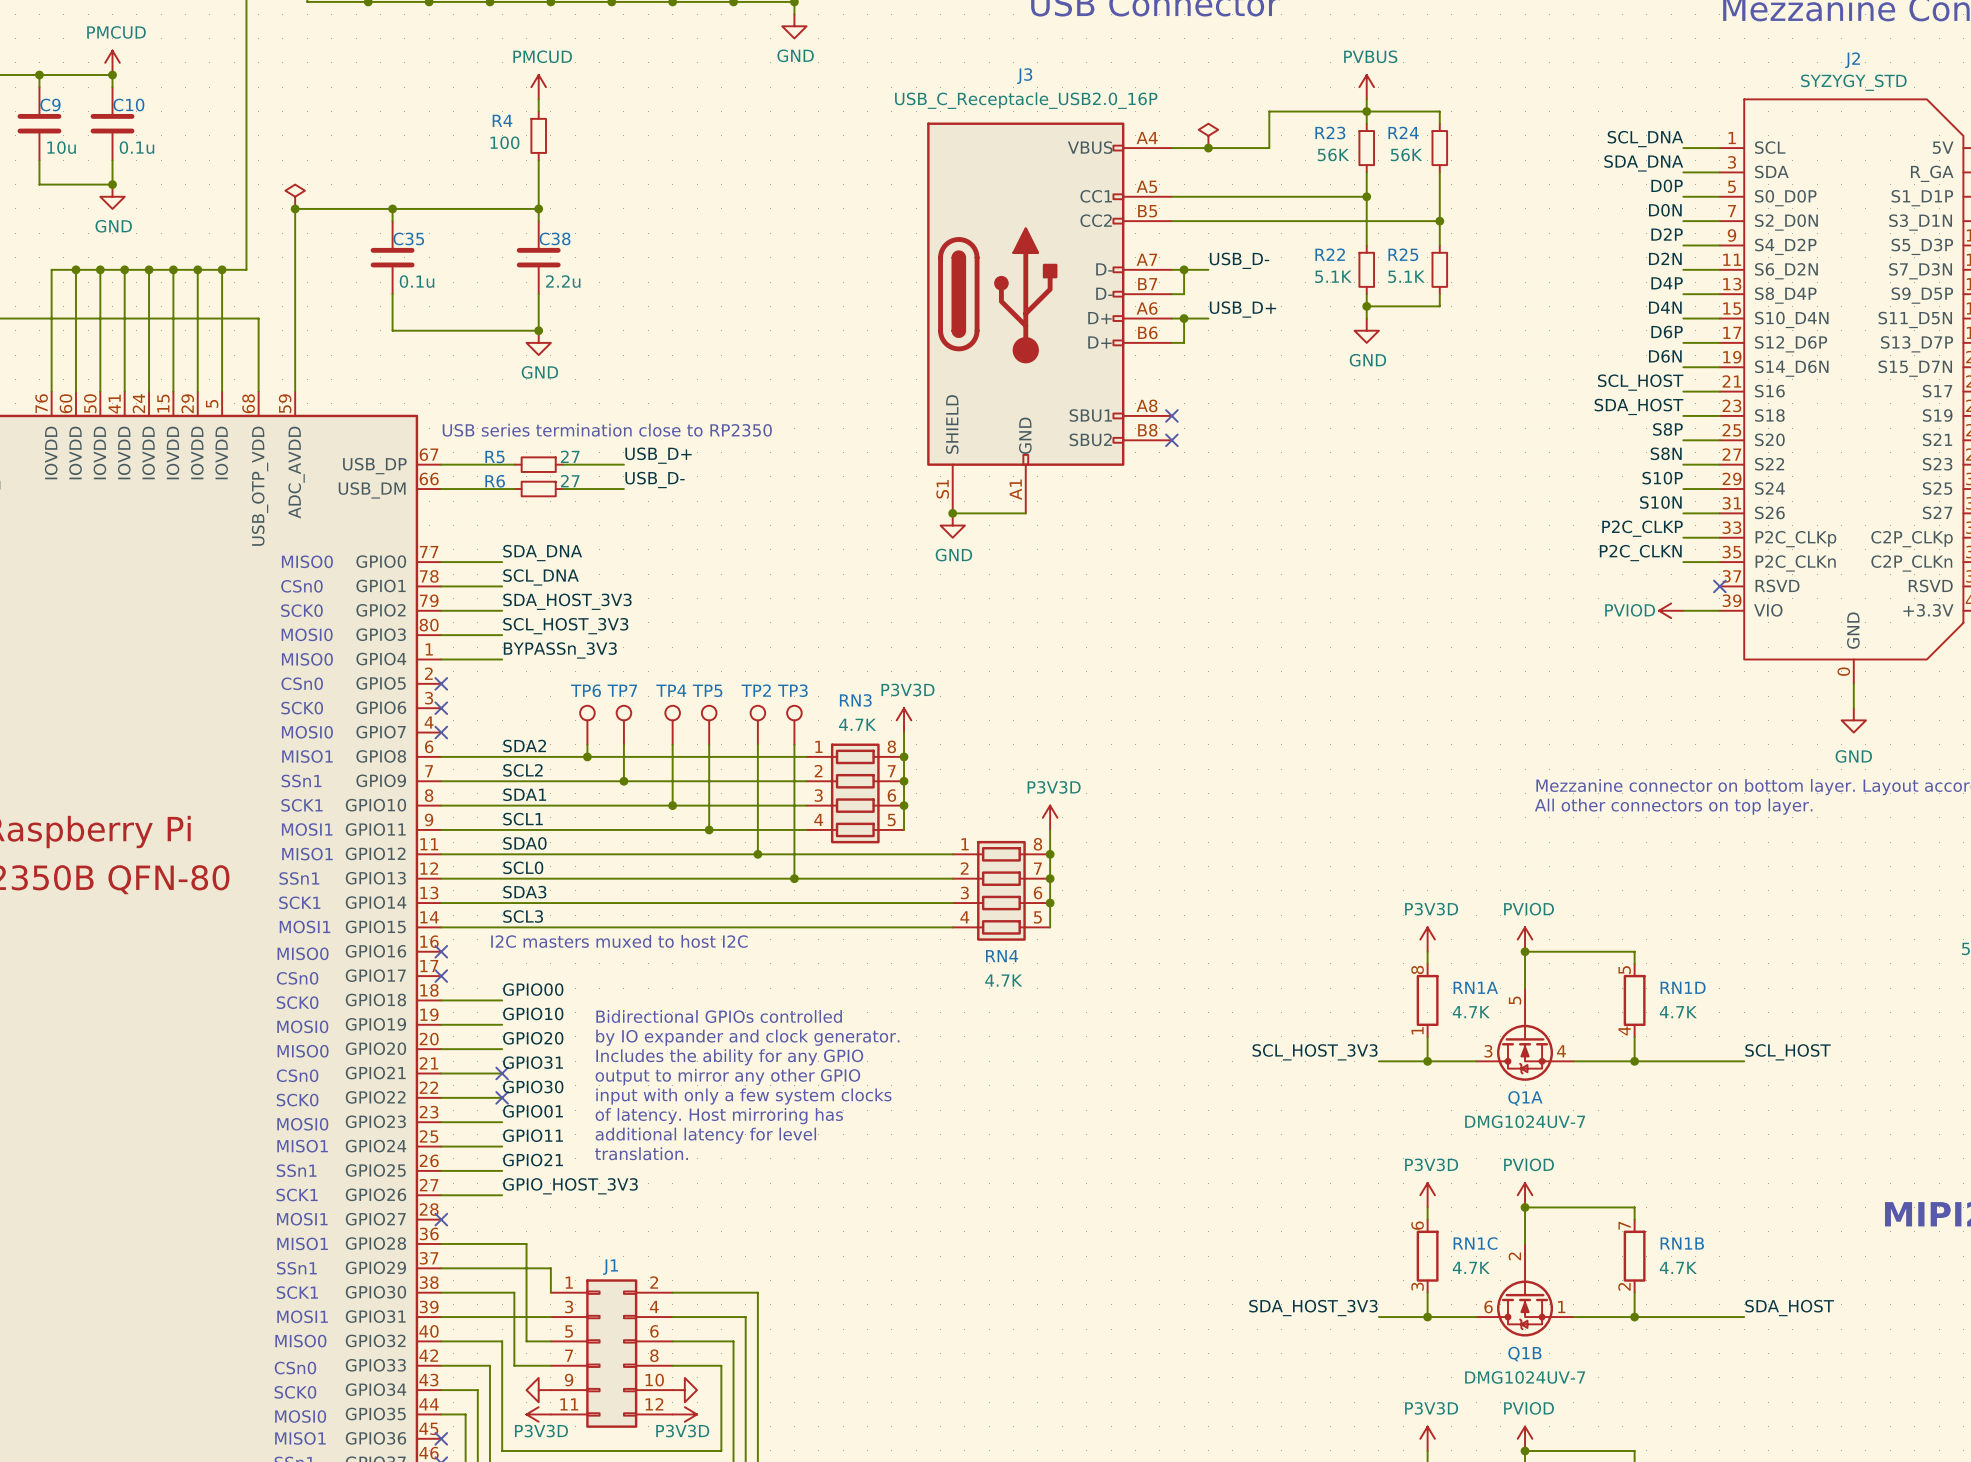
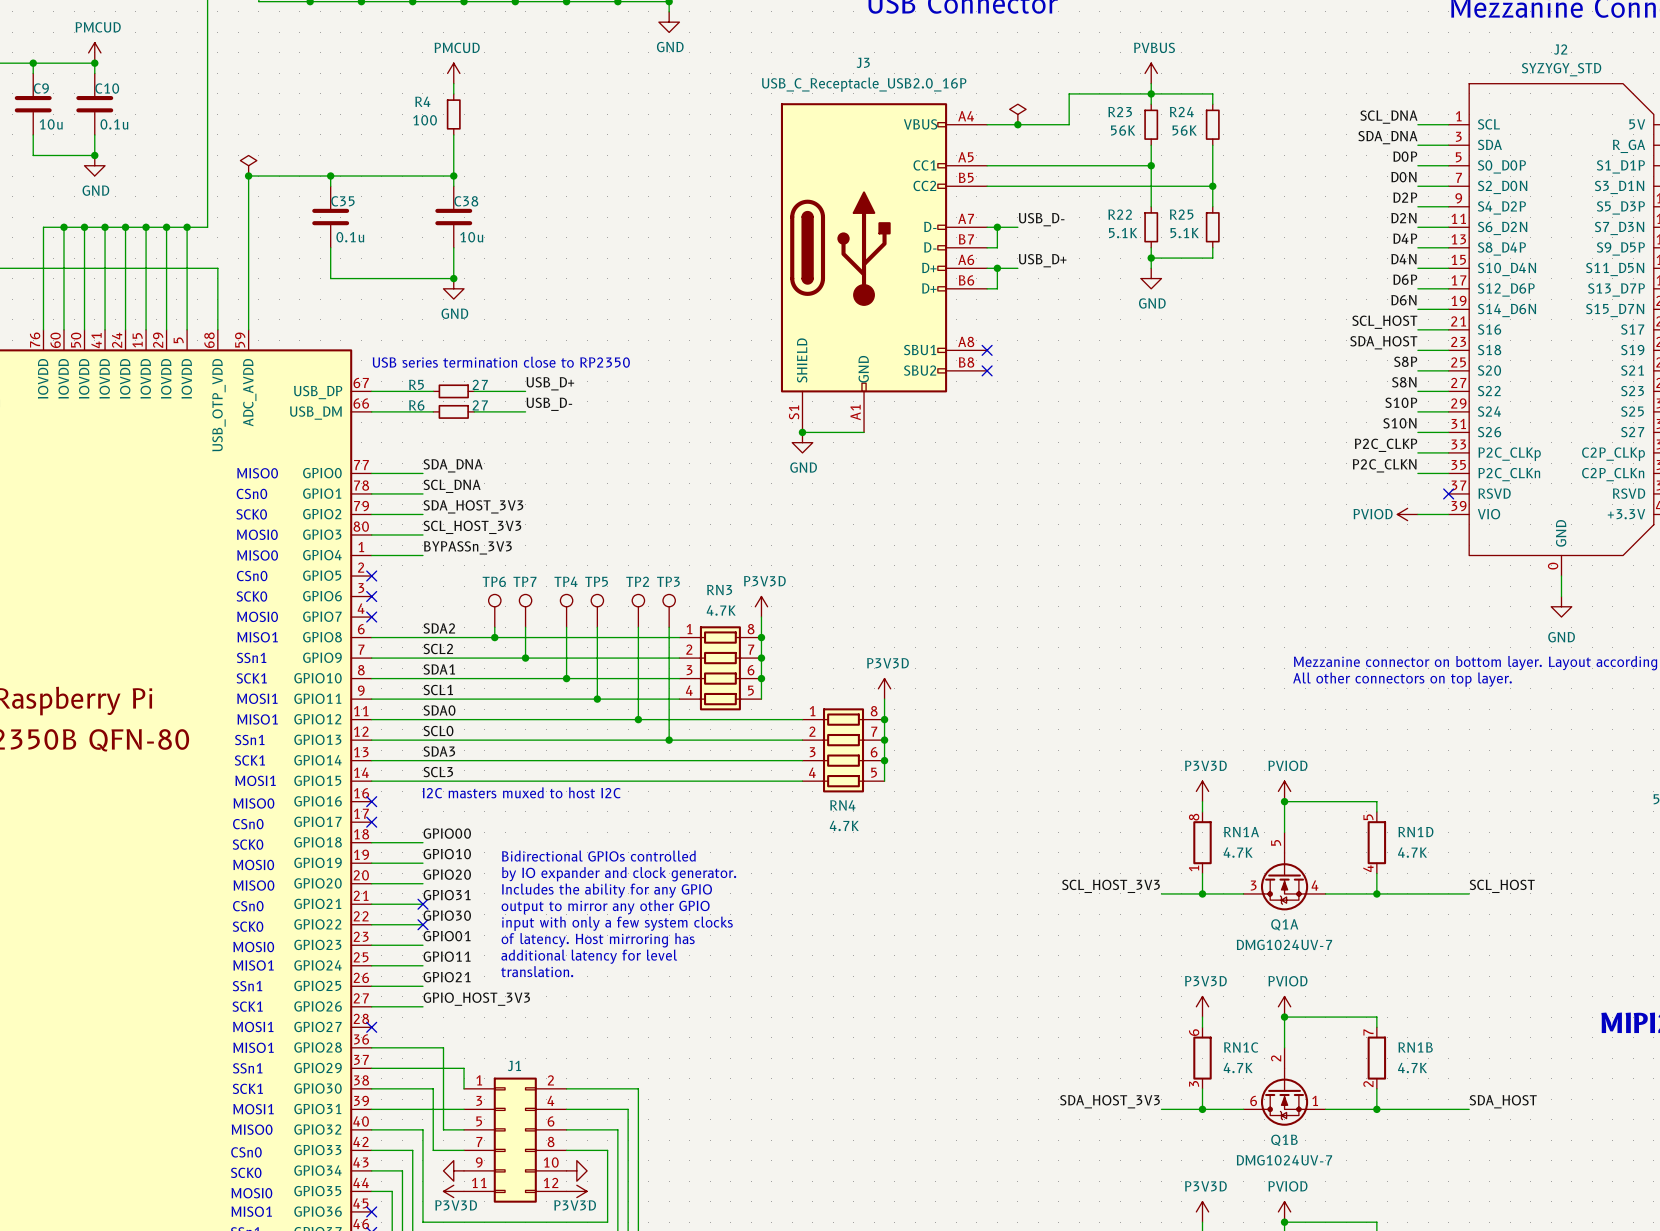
C38 value: 2.2u (563, 281) -> 10u (471, 237)

